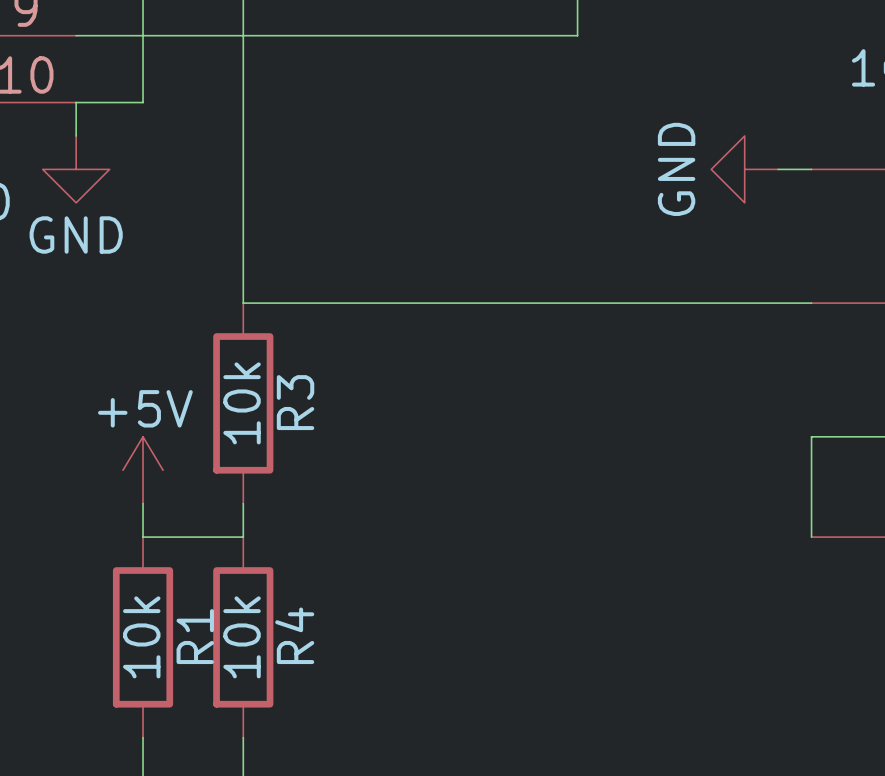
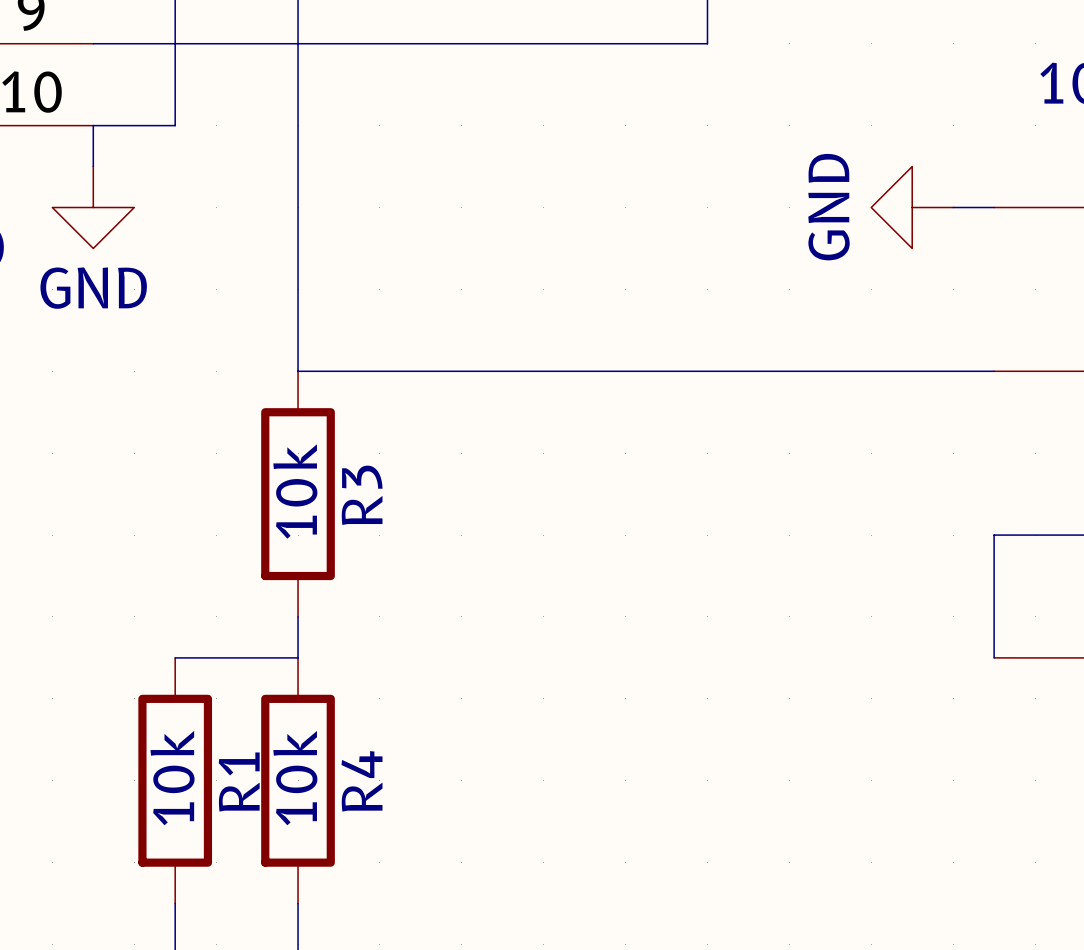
power symbol: +5V (143, 470) -> none
wire: (143, 503) (143, 537) -> none

